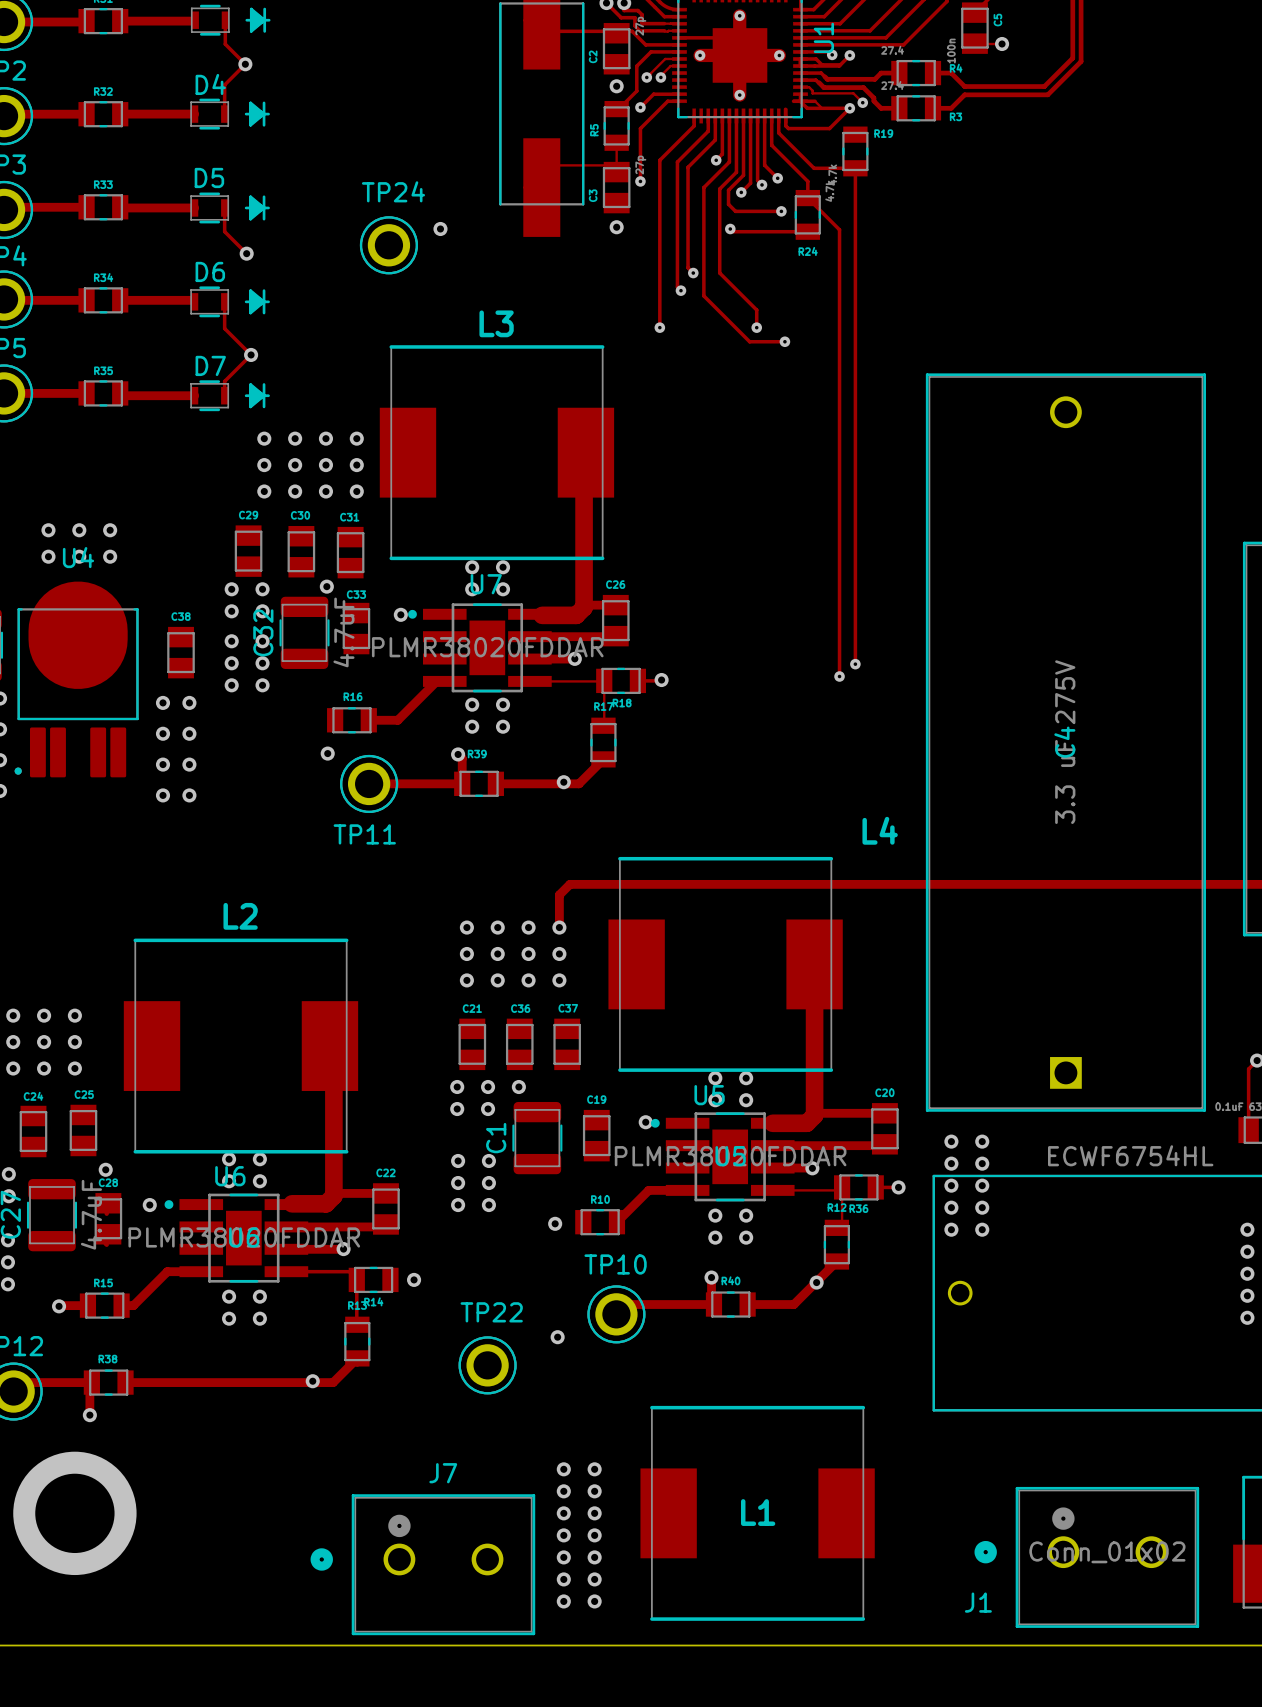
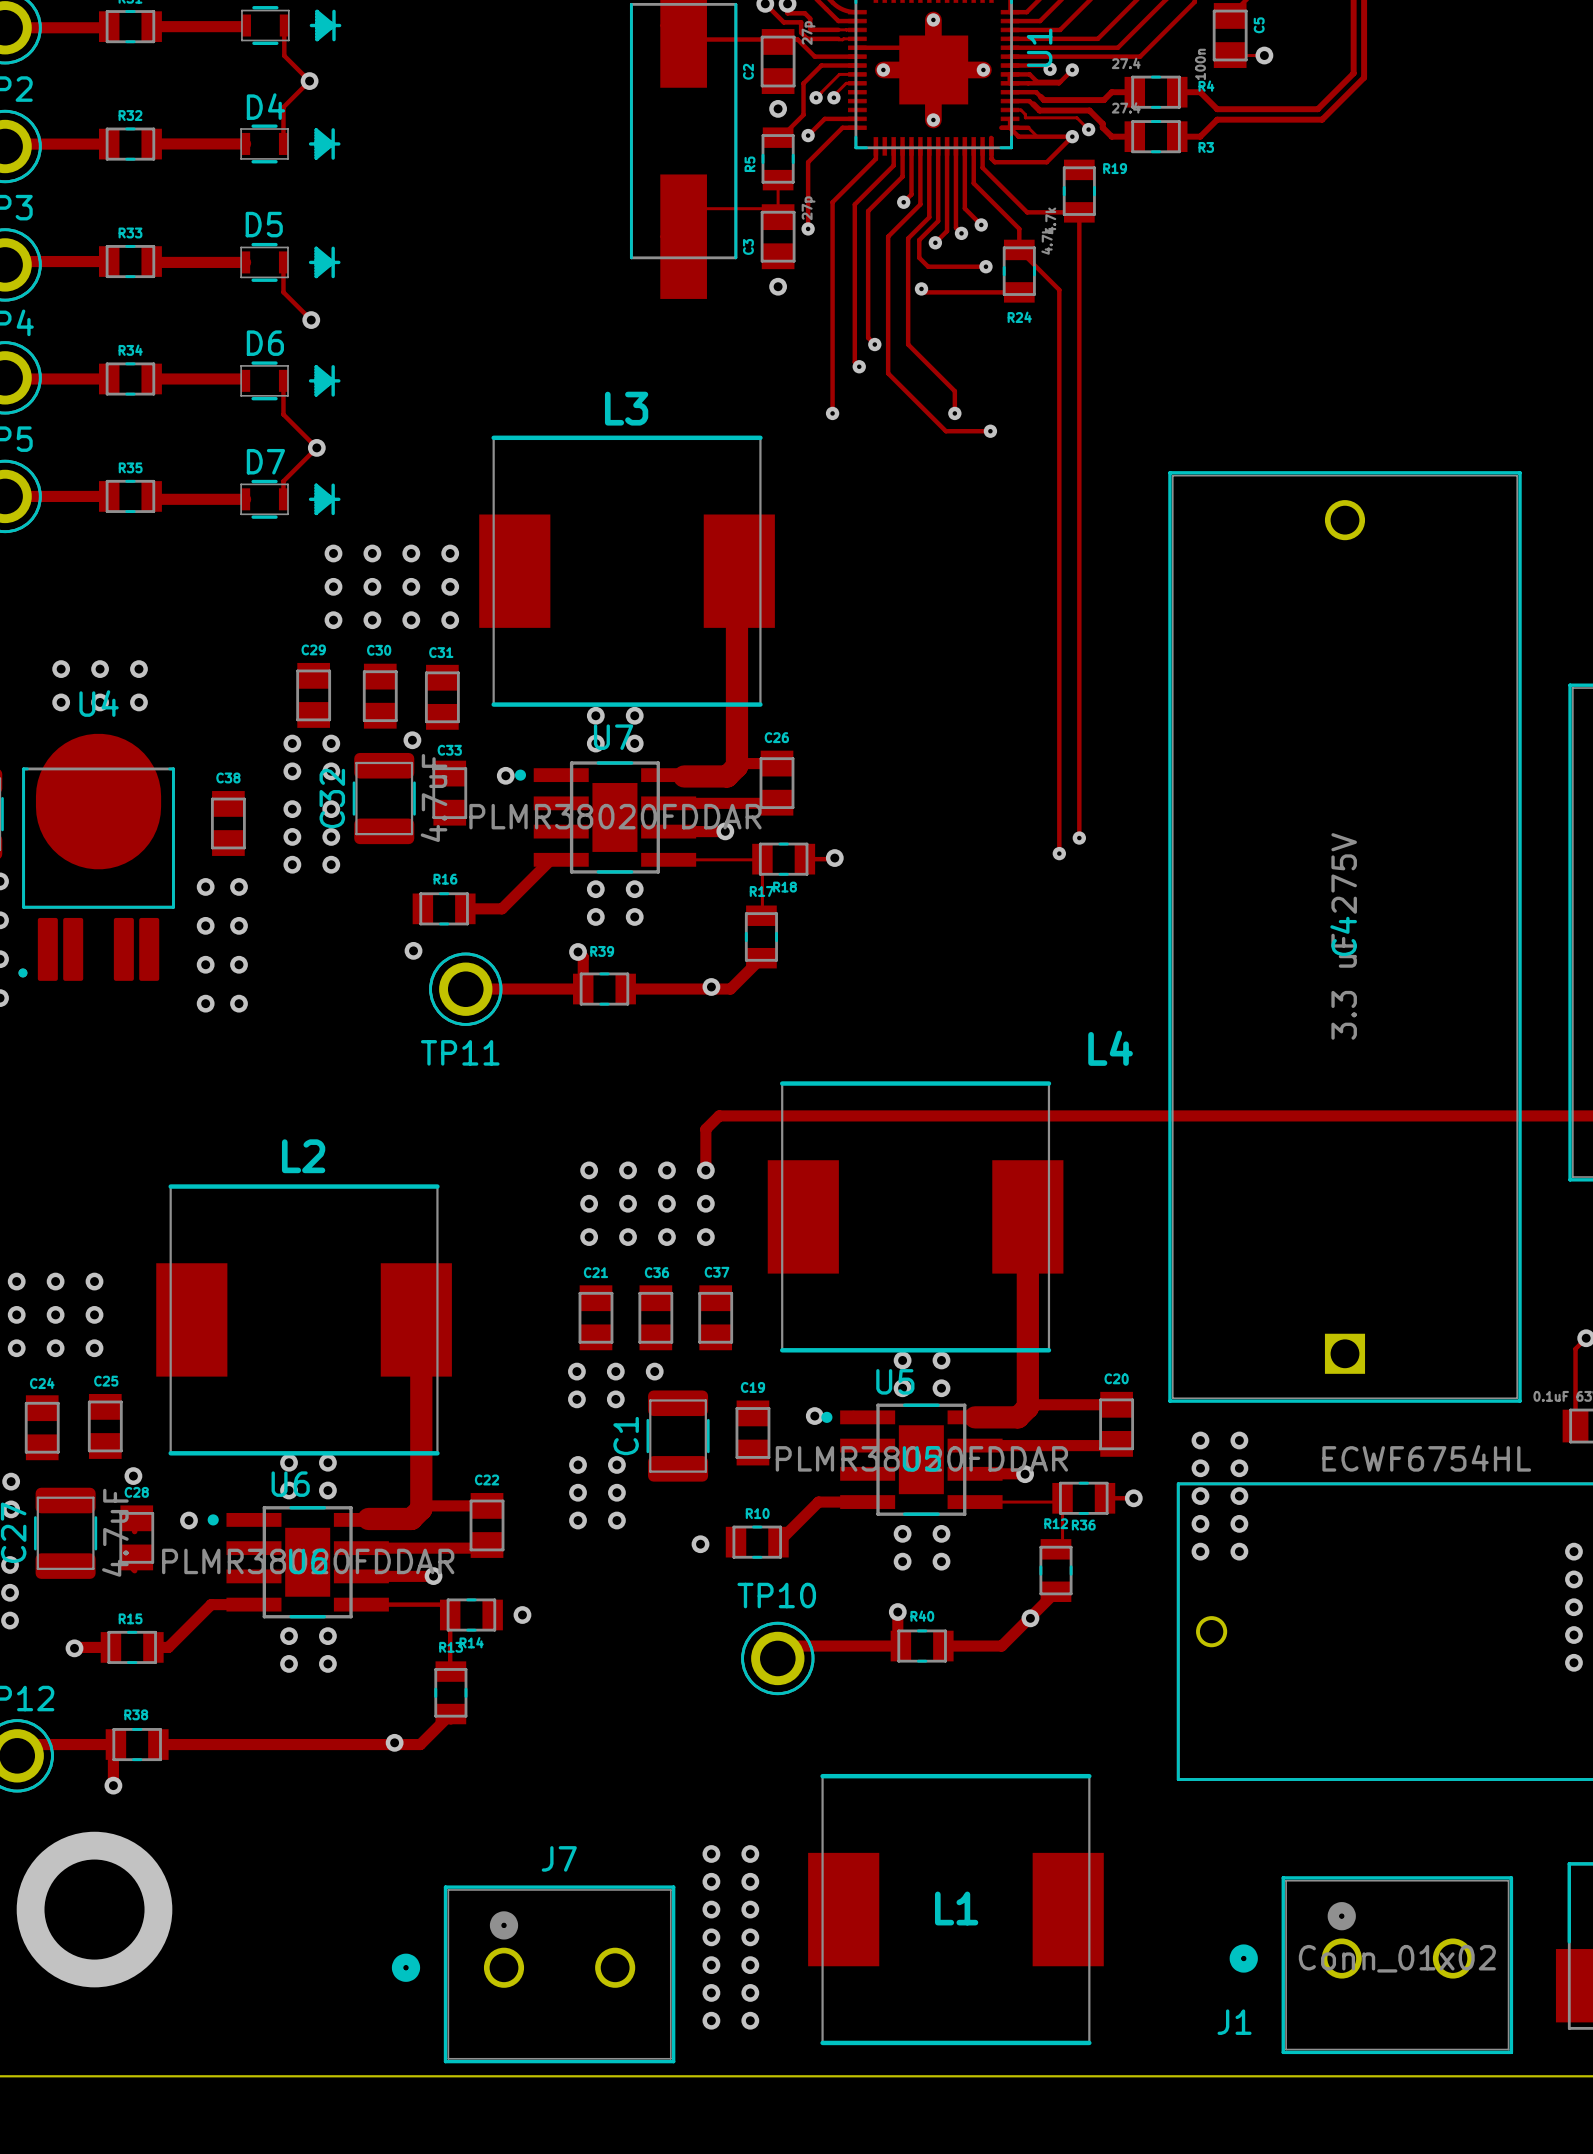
via: (440, 228) -> none
TP24: (388, 245) -> none
via: (557, 1337) -> none
TP22: (487, 1365) -> none

